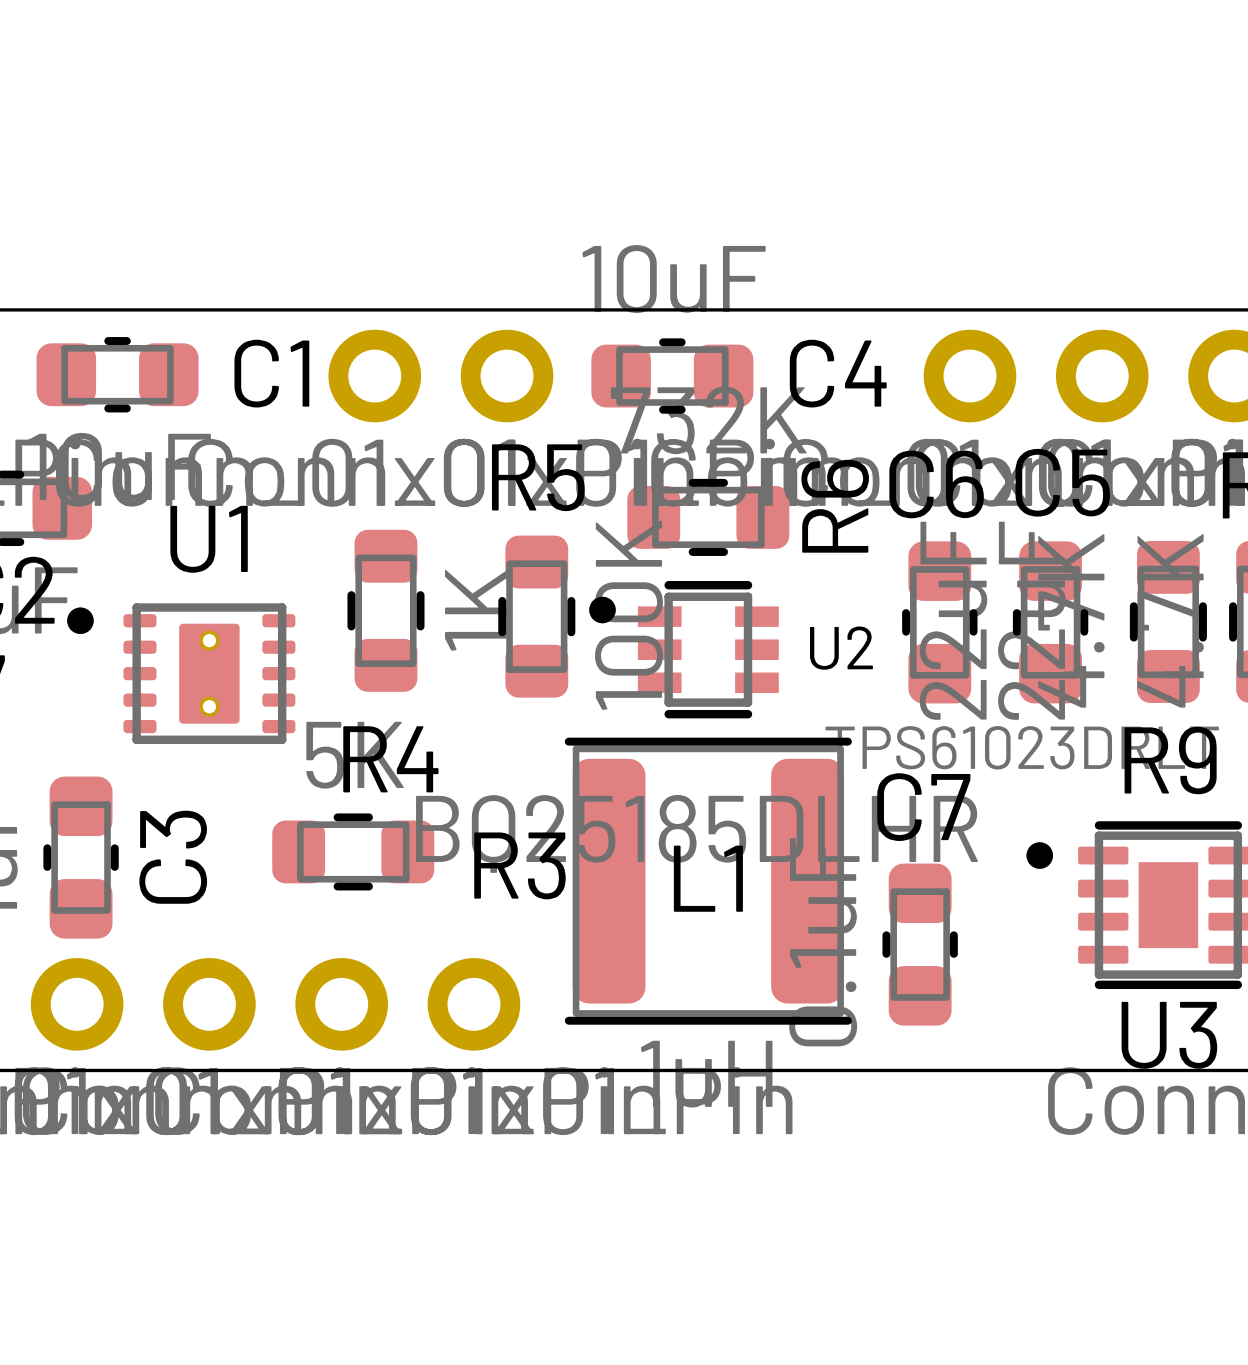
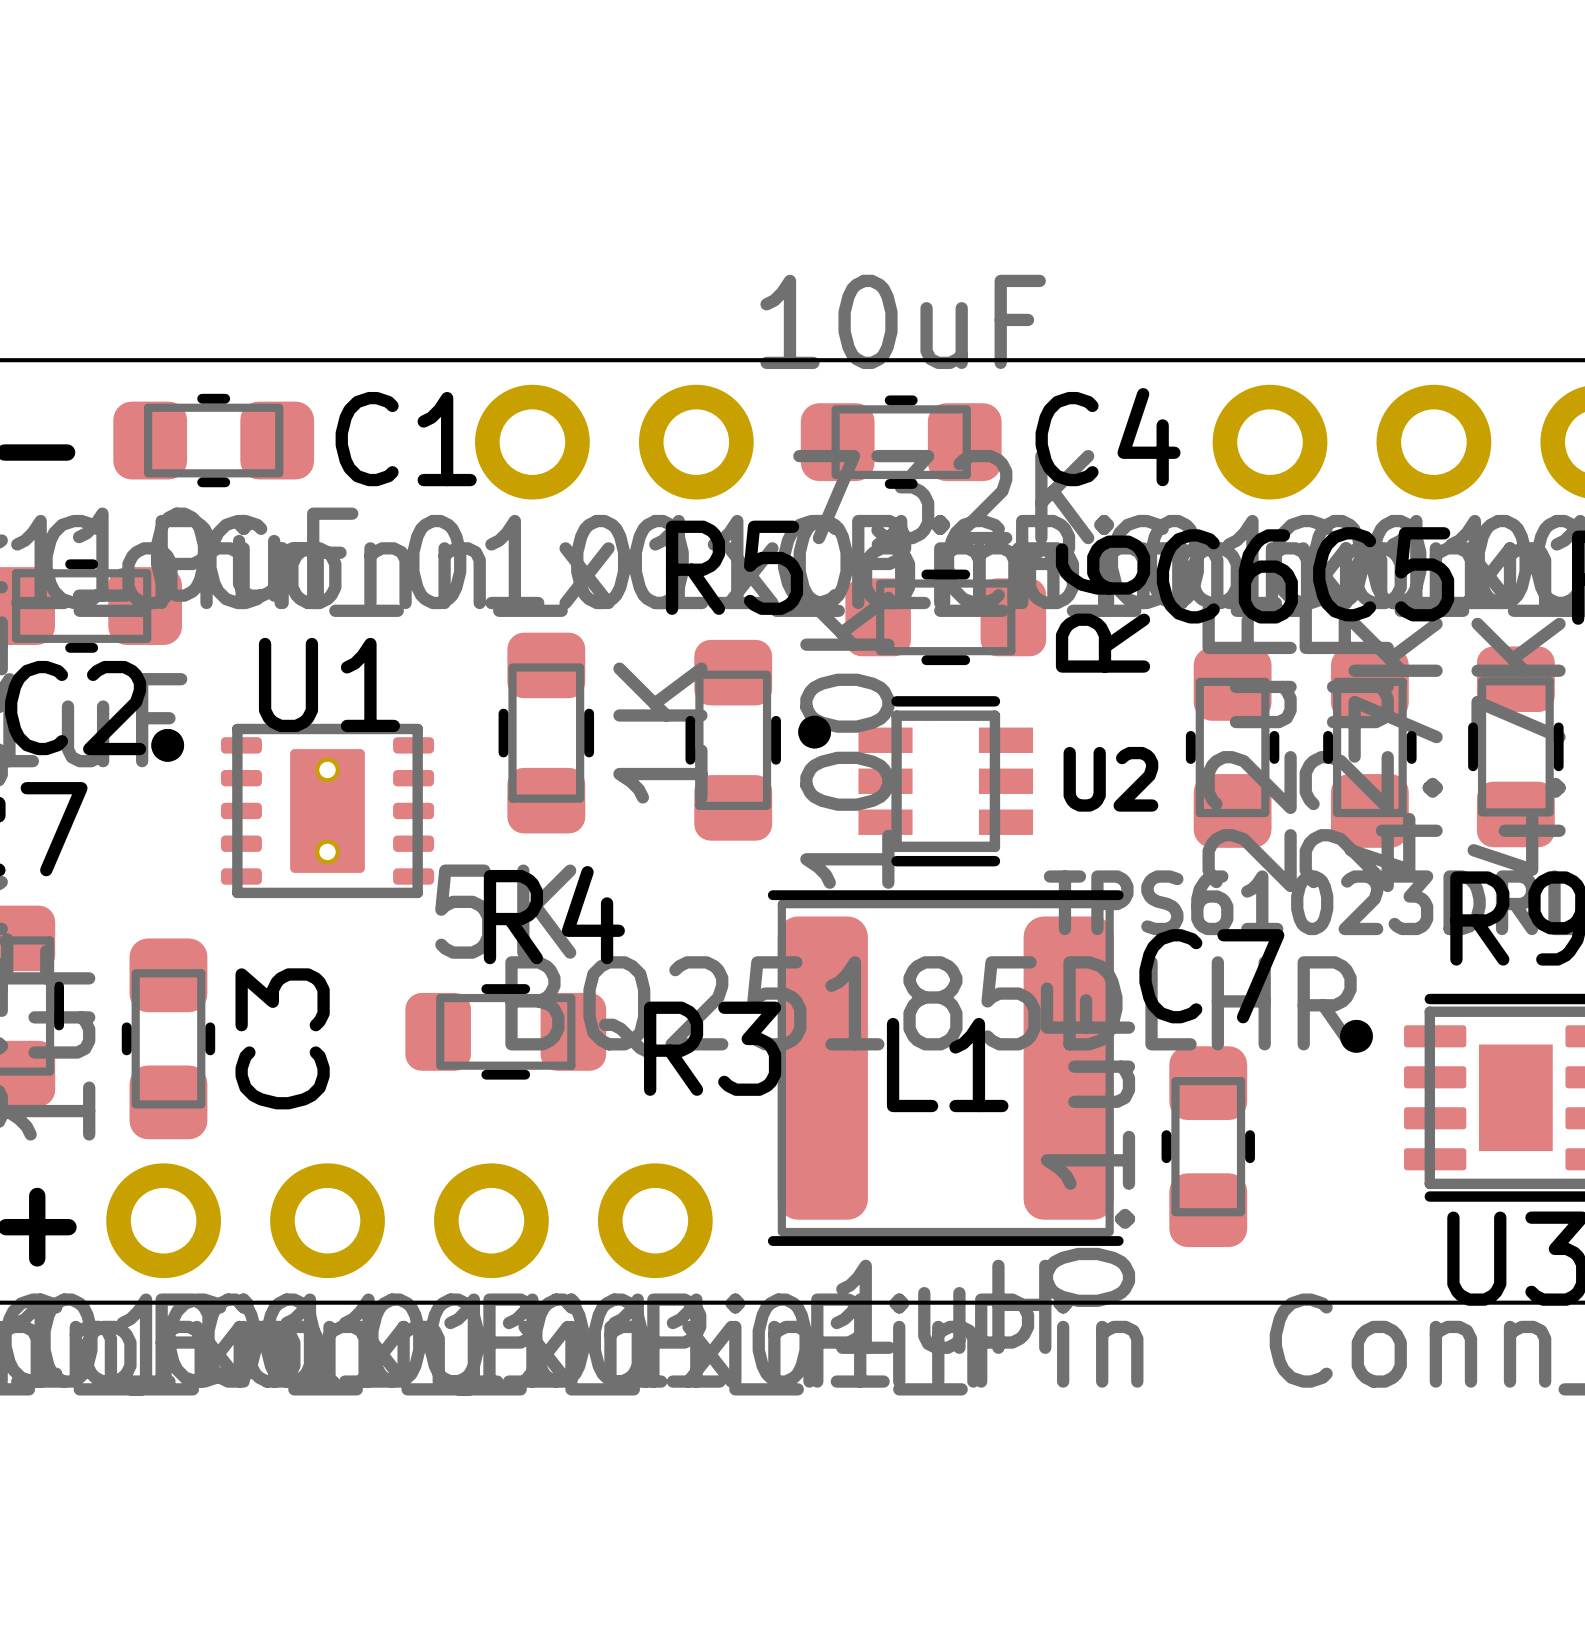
U1 name position: U1 (209, 539) -> U1 (329, 684)

